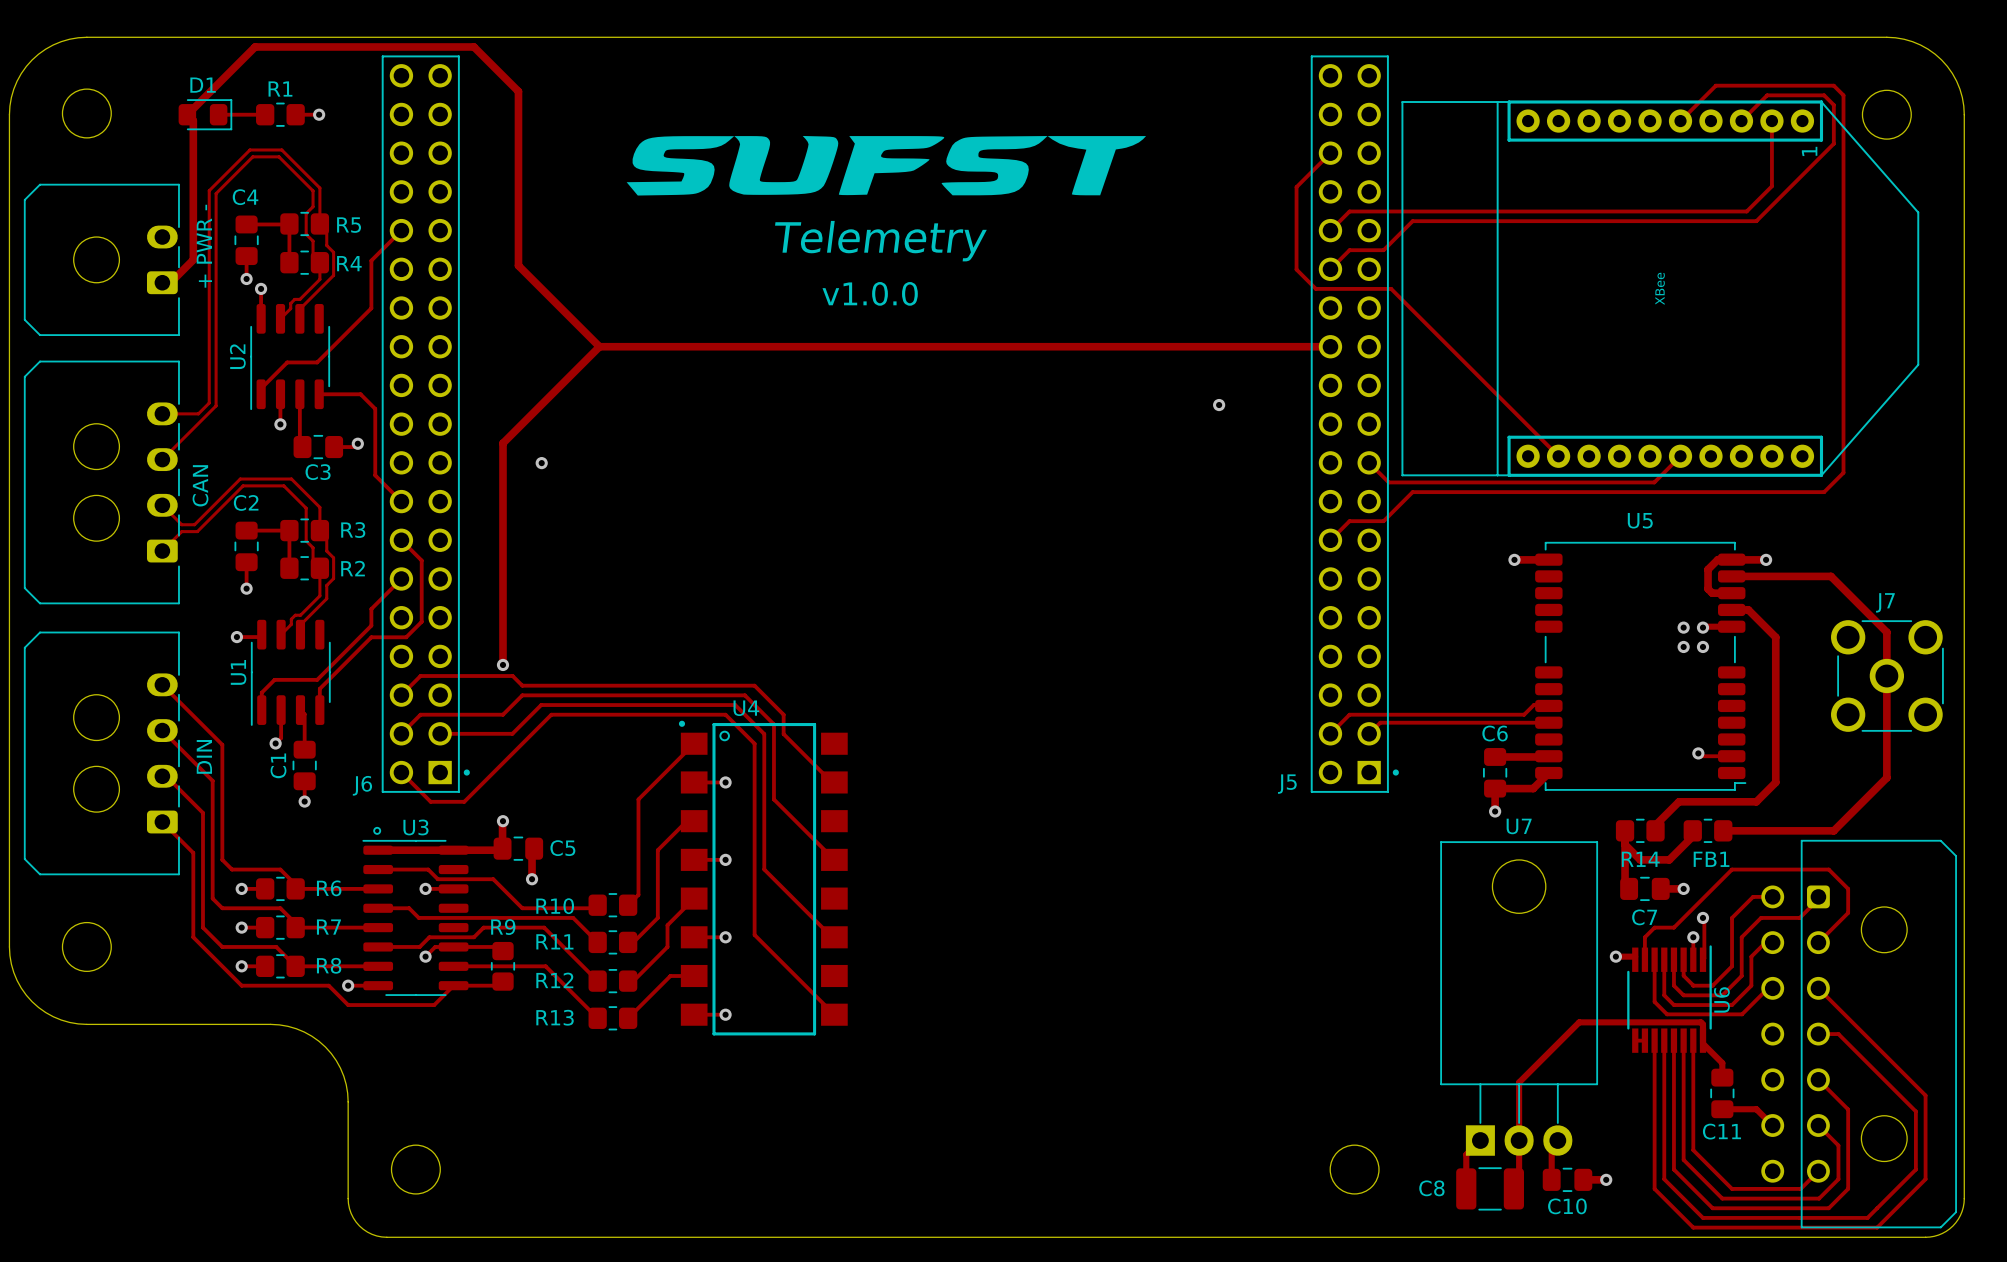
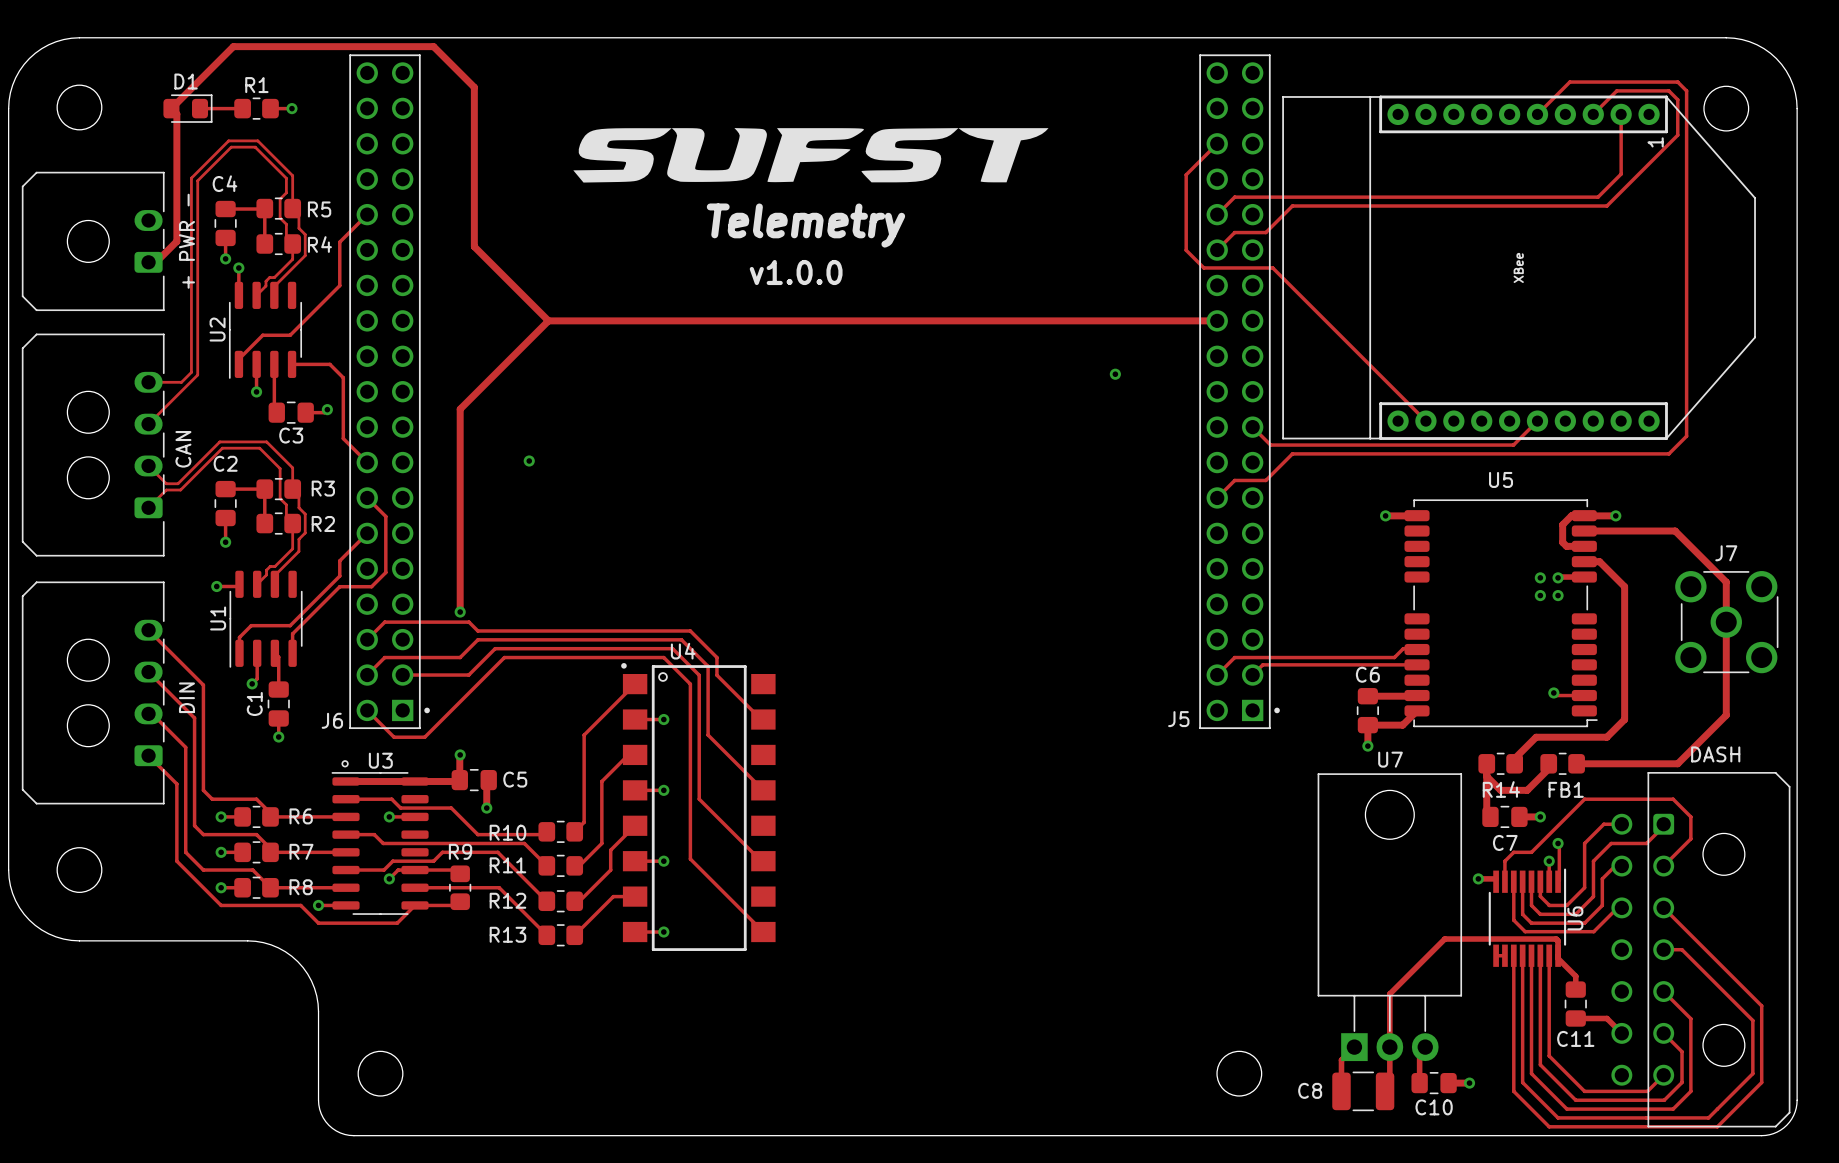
via position: (541, 463) -> (529, 460)
text: none -> DASH (1715, 754)

